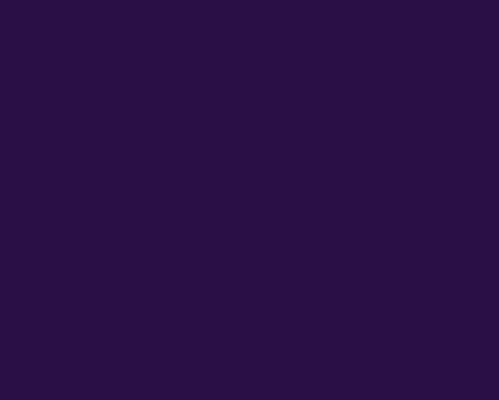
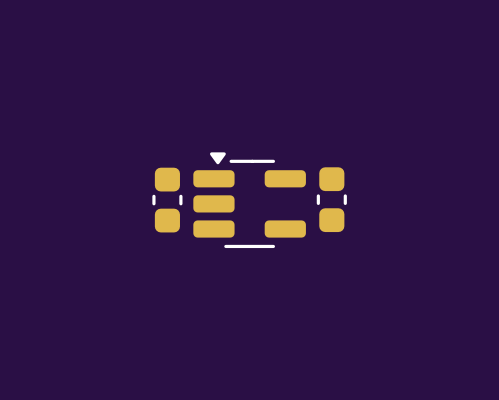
part: none -> (331, 199)
part: none -> (167, 200)
part: none -> (249, 200)

